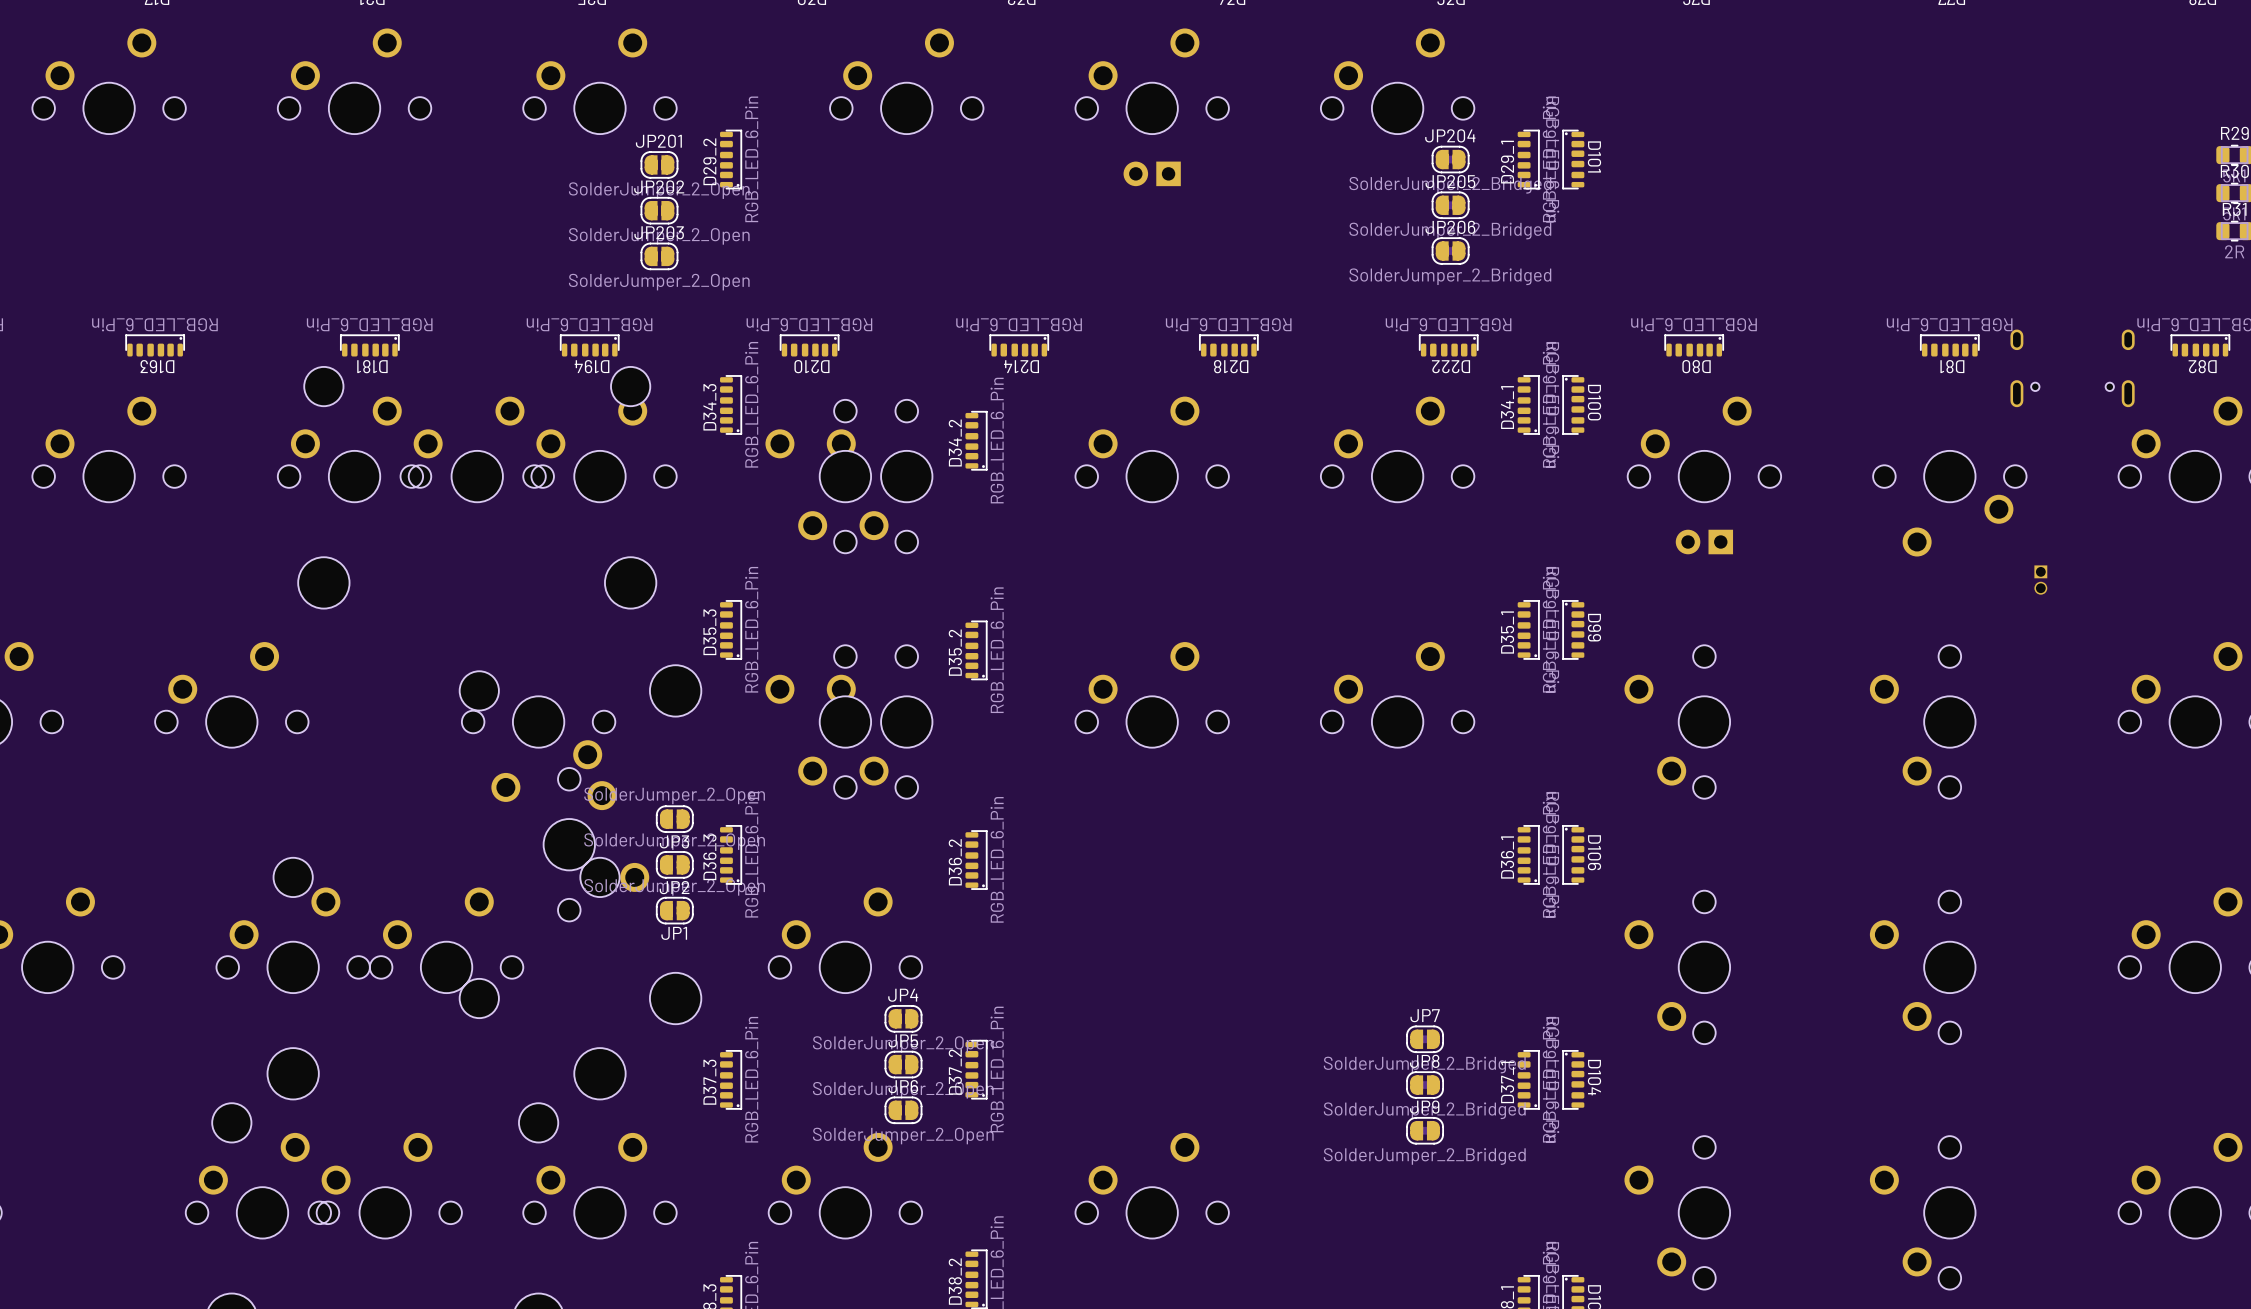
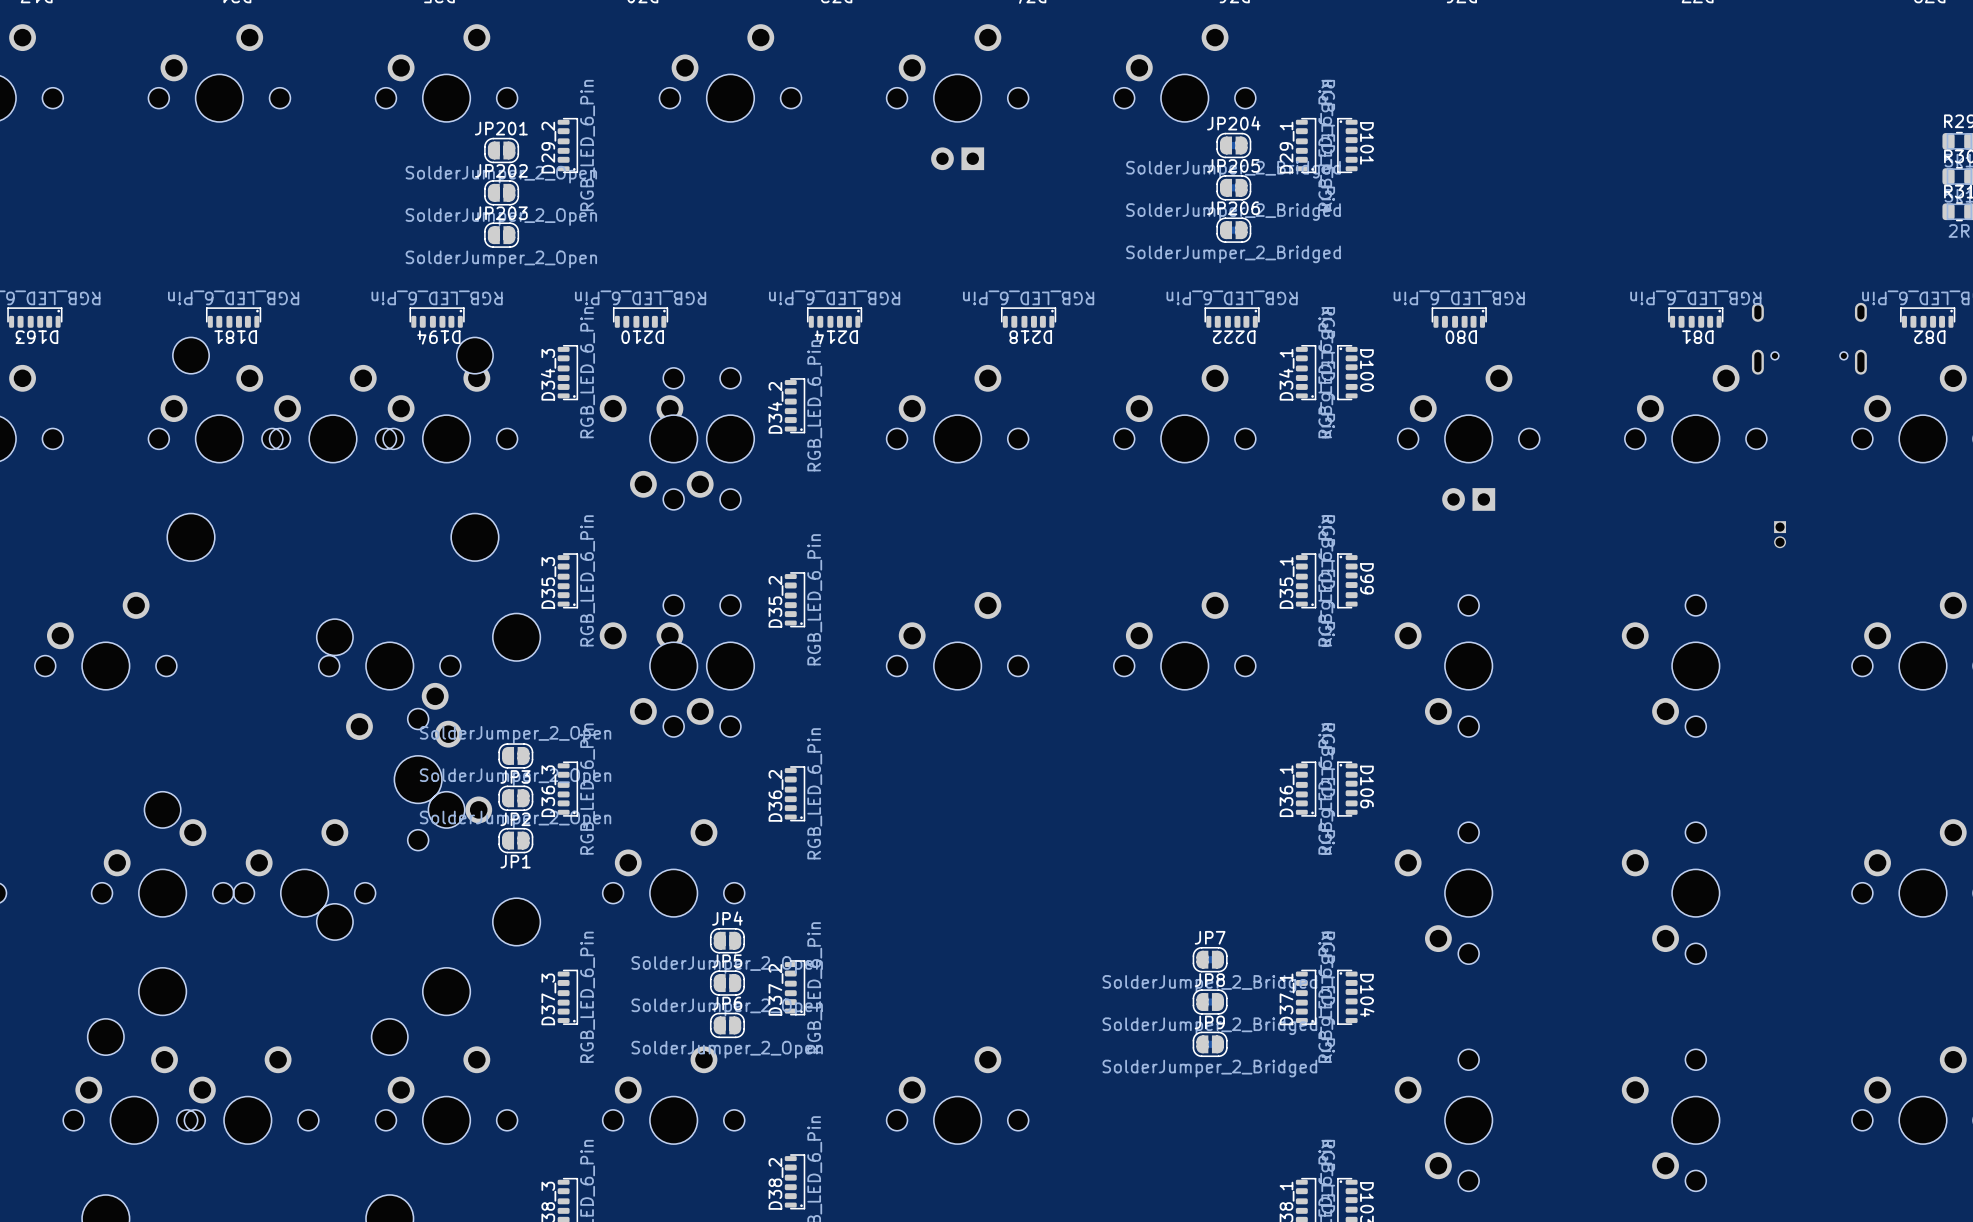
part rotation: 0° (1949, 503) -> 180° (1695, 413)

